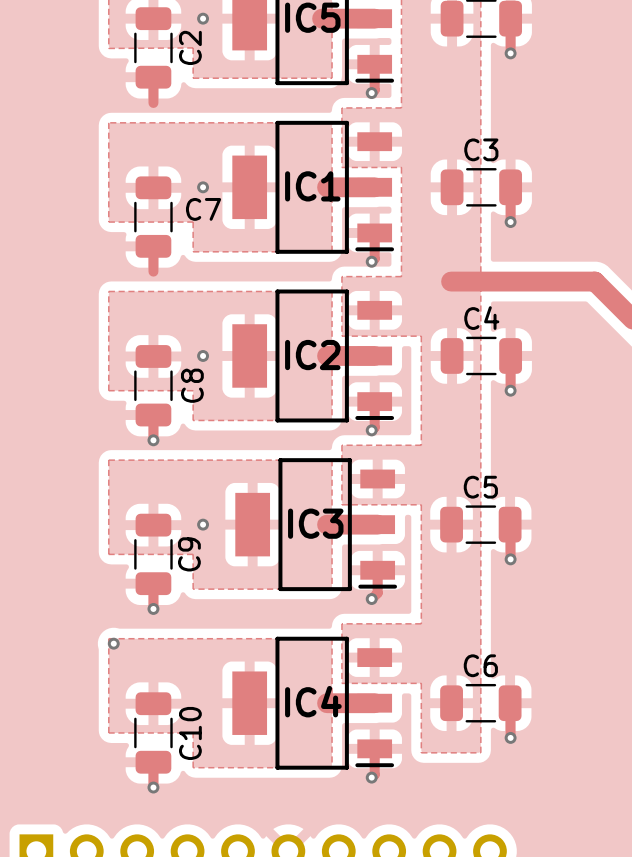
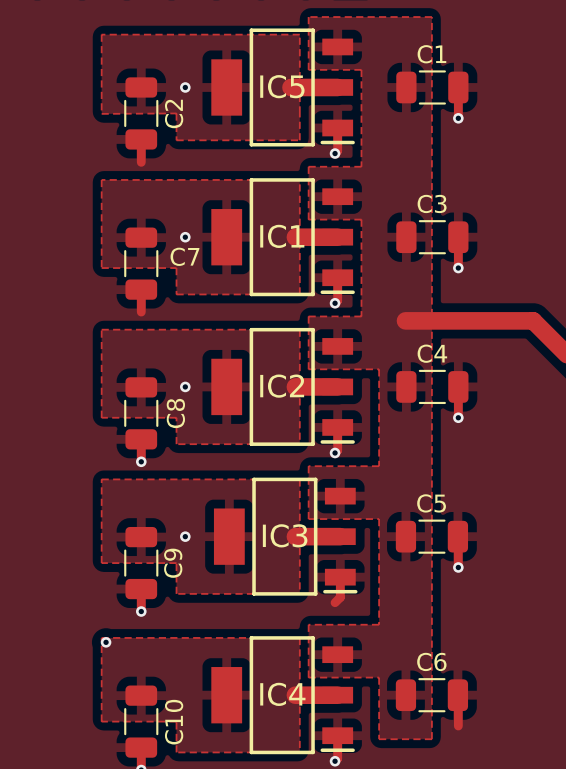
via: (371, 599) -> none
via: (510, 737) -> none

